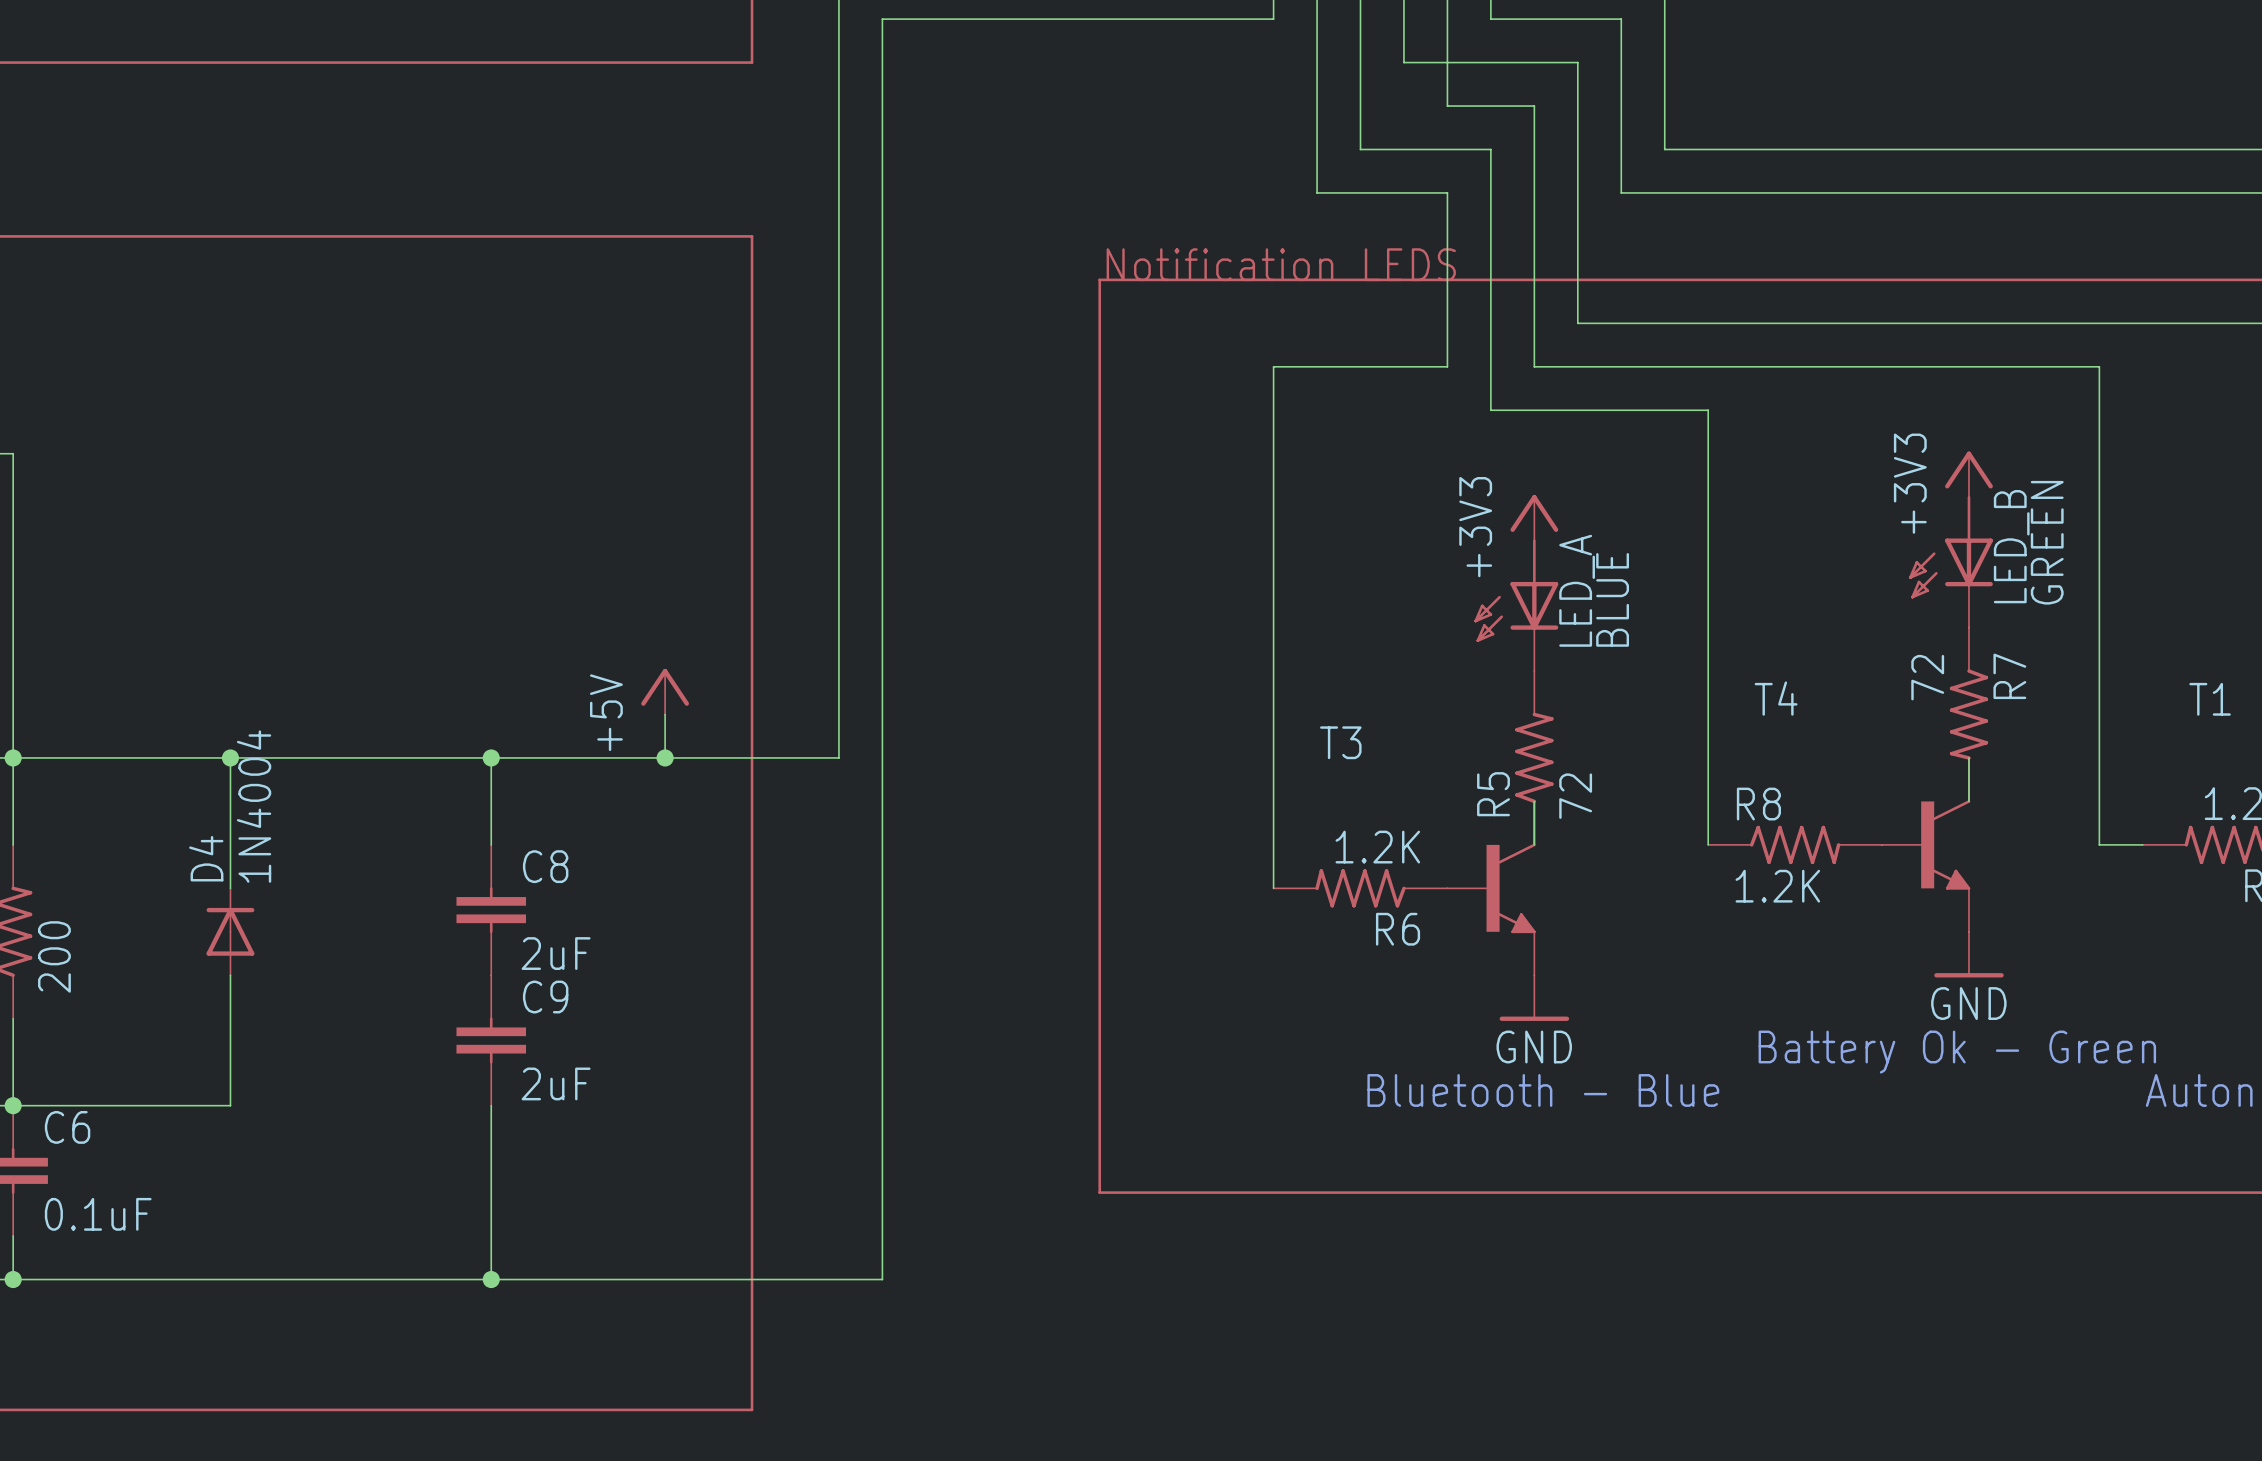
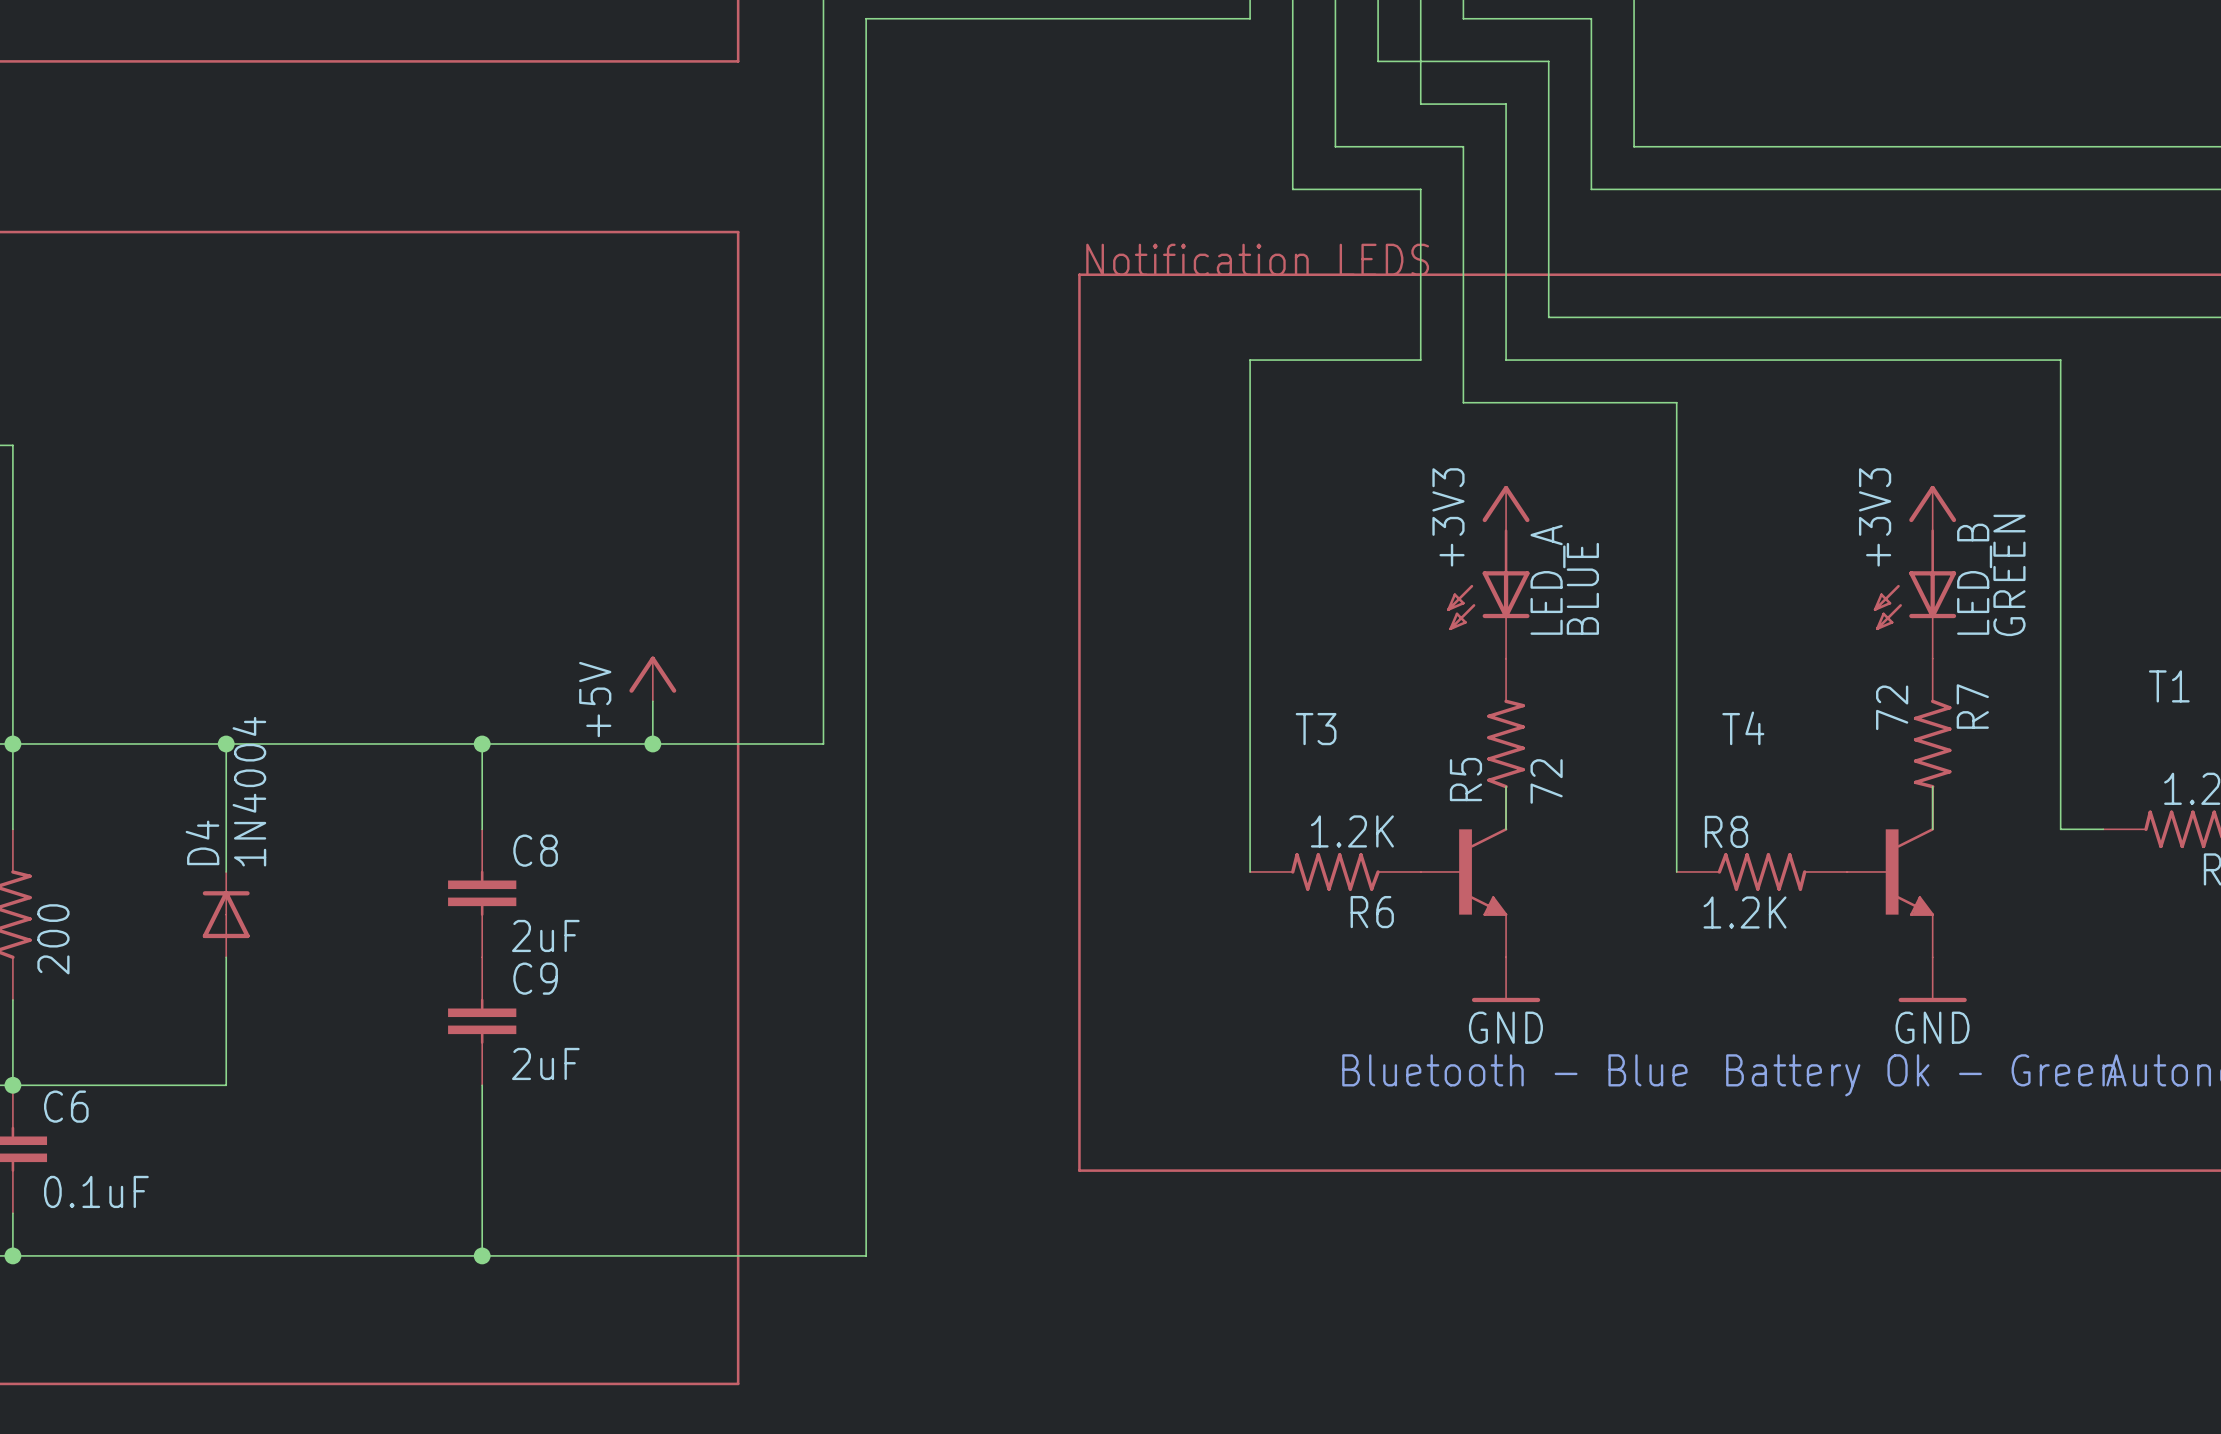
power symbol position: +3V3 (1968, 474) -> +3V3 (1932, 508)
LED_B position: (1950, 561) -> (1914, 594)
R7 position: (1968, 714) -> (1932, 744)
wire: (1968, 757) (1968, 801) -> (1932, 829) (1932, 786)
wire: none -> (1676, 829) (1676, 871)
R8 position: (1795, 844) -> (1762, 871)
T4 position: (1926, 844) -> (1890, 871)
power symbol position: GND (1968, 954) -> GND (1932, 979)
text position: Battery Ok - Green (1957, 1052) -> Battery Ok - Green (1921, 1075)

